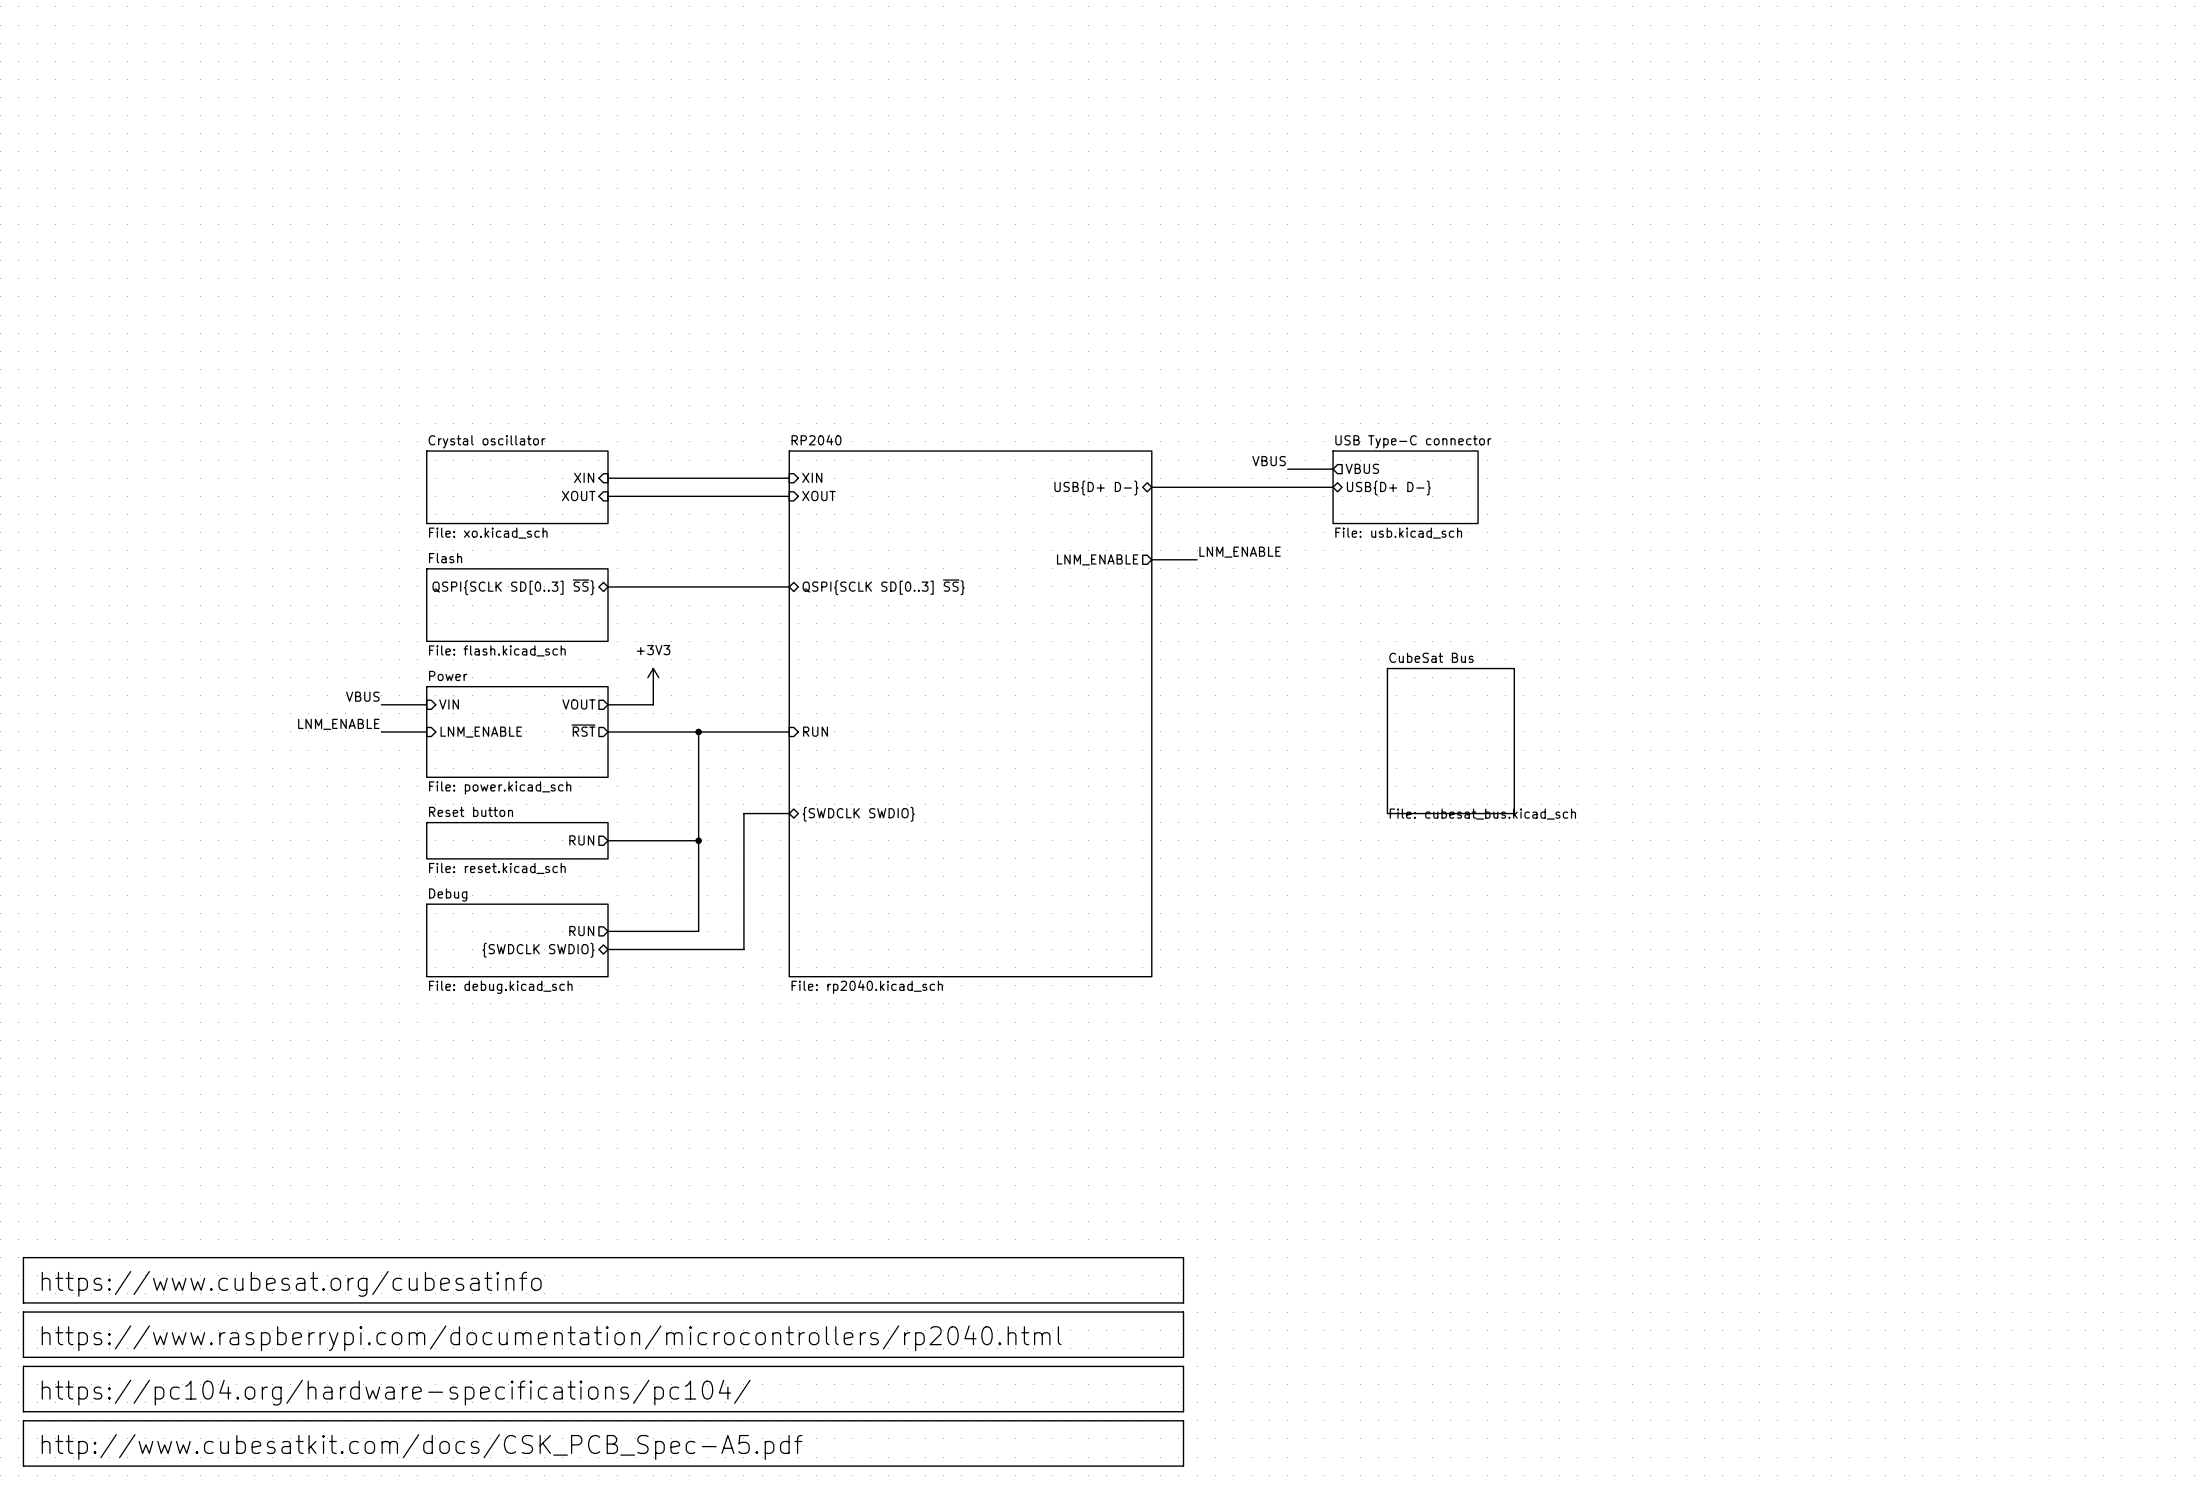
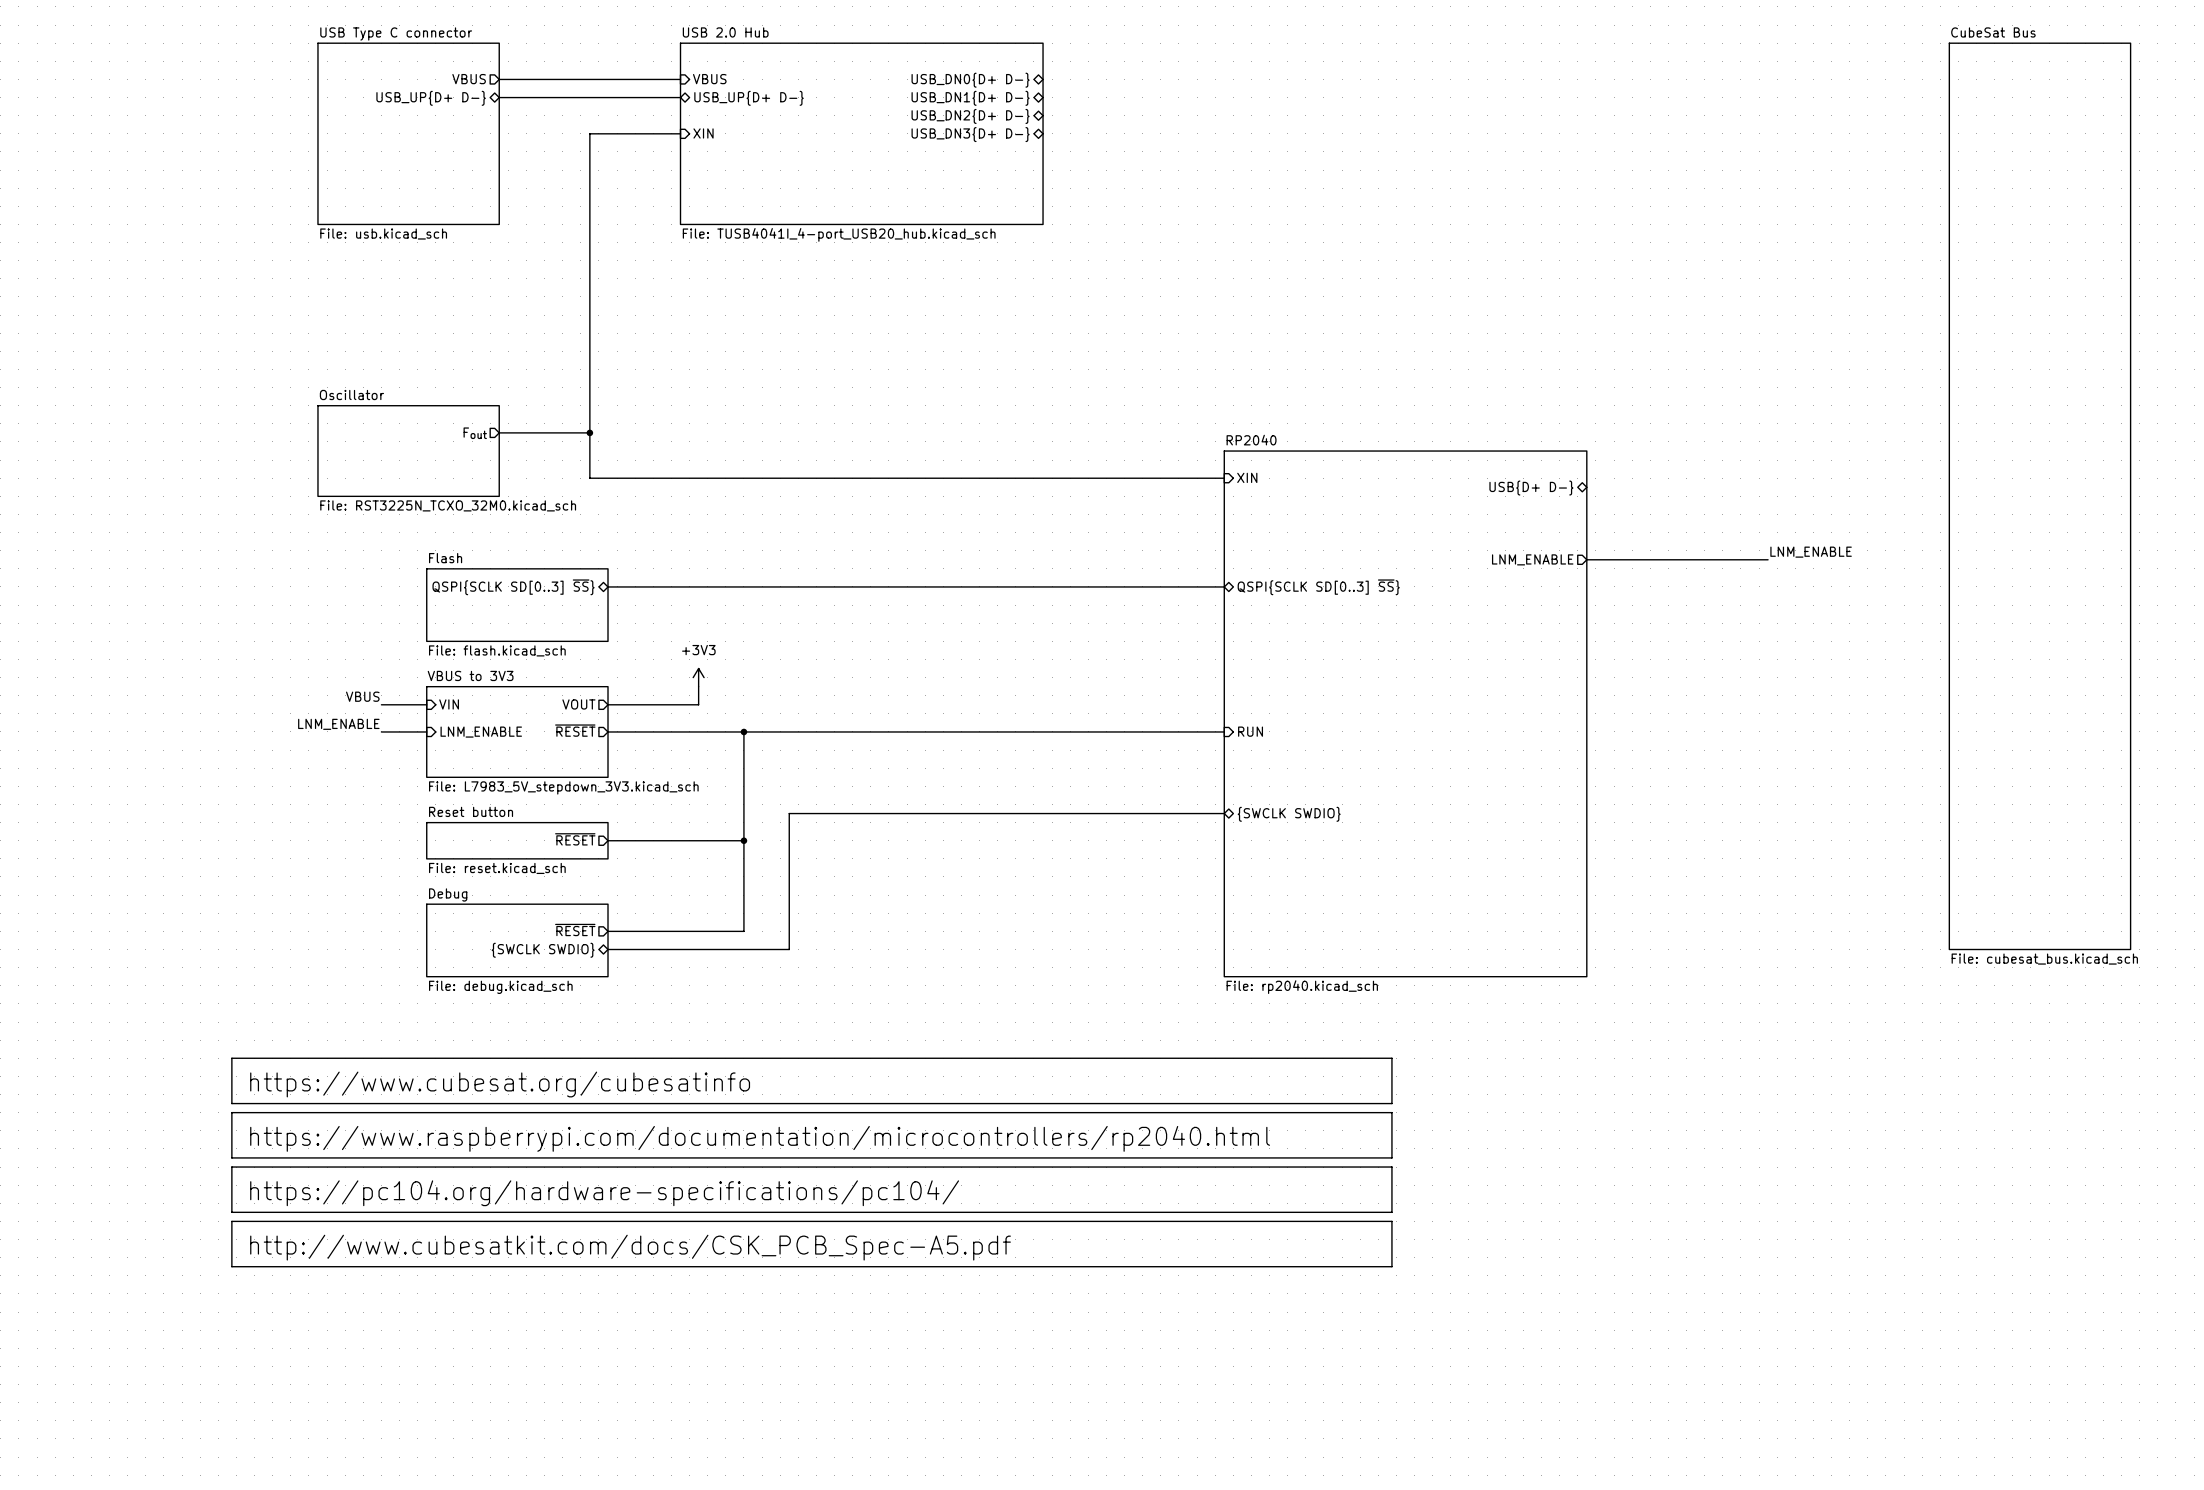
sheet pin: none -> VBUS (469, 79)
wire: none -> (499, 79) (680, 79)
sheet pin: none -> VBUS (709, 79)
sheet pin: none -> USB_DN0{D+ D-} (970, 80)
bus: none -> (499, 97) (680, 97)
sheet pin: none -> USB_UP{D+ D-} (431, 98)
sheet pin: none -> USB_UP{D+ D-} (749, 98)
sheet pin: none -> USB_DN1{D+ D-} (970, 98)
sheet pin: none -> USB_DN2{D+ D-} (970, 116)
sheet USB Type C connector: none -> File: usb.kicad_sch (408, 133)
wire: none -> (680, 133) (589, 133) (589, 478) (608, 478)
sheet pin: none -> XIN (703, 133)
sheet USB 2.0 Hub: none -> File: TUSB4041I_4-port_USB20_hub.kicad_sch (861, 133)
sheet pin: none -> USB_DN3{D+ D-} (970, 134)
wire: none -> (499, 432) (589, 432)
junction: none -> (589, 432)
sheet pin: none -> Fout (475, 433)
sheet Oscillator: none -> File: RST3225N_TCXO_32M0.kicad_sch (408, 451)
label: VBUS (1269, 461) -> none
sheet pin: VBUS (1362, 468) -> none
wire: (1287, 469) (1333, 469) -> none
sheet pin: XIN (584, 477) -> none
sheet pin: XIN (812, 477) -> none
sheet pin: none -> XIN (1247, 477)
wire: none -> (789, 478) (1224, 478)
sheet Crystal oscillator: File: xo.kicad_sch (517, 487) -> none
bus: (1151, 487) (1333, 487) -> none
sheet USB Type-C connector: File: usb.kicad_sch (1405, 487) -> none
sheet pin: USB{D+ D-} (1096, 488) -> none
sheet pin: USB{D+ D-} (1388, 488) -> none
sheet pin: none -> USB{D+ D-} (1531, 488)
sheet pin: XOUT (578, 496) -> none
wire: (608, 496) (789, 496) -> none
sheet pin: XOUT (818, 496) -> none
sheet CubeSat Bus: none -> File: cubesat_bus.kicad_sch (2039, 496)
label: LNM_ENABLE (1240, 552) -> none
label: none -> LNM_ENABLE (1811, 552)
sheet pin: LNM_ENABLE (1097, 559) -> none
wire: (1151, 559) (1197, 559) -> none
sheet pin: none -> LNM_ENABLE (1532, 559)
wire: none -> (1586, 559) (1768, 559)
bus: none -> (789, 586) (1224, 586)
sheet pin: QSPI{SCLK SD[0..3] ~{SS}} (883, 587) -> none
sheet pin: none -> QSPI{SCLK SD[0..3] ~{SS}} (1318, 587)
sheet Power name: Power (448, 675) -> VBUS to 3V3 (470, 675)
power symbol position: +3V3 (653, 677) -> +3V3 (698, 677)
wire: (653, 686) (653, 704) -> (698, 686) (698, 704) (653, 704)
sheet RP2040 position: (970, 713) -> (1405, 713)
sheet pin: ~{RST} (583, 730) -> ~{RESET} (575, 730)
wire: (698, 731) (698, 931) -> (743, 731) (743, 931) (698, 931)
junction: (698, 731) -> none
junction: none -> (743, 731)
wire: none -> (789, 731) (1224, 731)
sheet pin: RUN (815, 731) -> none
sheet pin: none -> RUN (1250, 731)
sheet CubeSat Bus: File: cubesat_bus.kicad_sch (1450, 741) -> none
sheet Power value: File: power.kicad_sch (500, 787) -> File: L7983_5V_stepdown_3V3.kicad_sch (563, 787)
bus: (789, 813) (743, 813) (743, 949) -> (1224, 813) (789, 813) (789, 949) (743, 949)
sheet pin: {SWDCLK SWDIO} (858, 814) -> none
sheet pin: none -> {SWCLK SWDIO} (1289, 814)
sheet pin: RUN (581, 840) -> ~{RESET} (575, 839)
wire: none -> (698, 840) (743, 840)
junction: (698, 840) -> none
junction: none -> (743, 840)
sheet pin: RUN (581, 931) -> ~{RESET} (575, 929)
sheet pin: {SWDCLK SWDIO} (538, 950) -> {SWCLK SWDIO} (543, 950)
line: none -> (231, 1058) (231, 1103) (1391, 1103) (1391, 1058) (231, 1058)
text: none -> https://www.cubesat.org/cubesatinfo (500, 1084)
line: none -> (231, 1112) (231, 1157) (1391, 1157) (1391, 1112) (231, 1112)
text: none -> https://www.raspberrypi.com/documentation/microcontrollers/rp2040.html (760, 1138)
line: none -> (231, 1167) (231, 1212) (1391, 1212) (1391, 1167) (231, 1167)
text: none -> https://pc104.org/hardware-specifications/pc104/ (604, 1193)
line: none -> (231, 1221) (1391, 1221) (1391, 1266) (231, 1266) (231, 1221)
text: none -> http://www.cubesatkit.com/docs/CSK_PCB_Spec-A5.pdf (630, 1247)
line: (23, 1257) (23, 1302) (1183, 1302) (1183, 1257) (23, 1257) -> none
text: https://www.cubesat.org/cubesatinfo (291, 1283) -> none
line: (23, 1312) (23, 1357) (1183, 1357) (1183, 1312) (23, 1312) -> none
text: https://www.raspberrypi.com/documentation/microcontrollers/rp2040.html (551, 1338) -> none
line: (23, 1366) (23, 1411) (1183, 1411) (1183, 1366) (23, 1366) -> none
text: https://pc104.org/hardware-specifications/pc104/ (396, 1392) -> none
line: (23, 1420) (1183, 1420) (1183, 1466) (23, 1466) (23, 1420) -> none
text: http://www.cubesatkit.com/docs/CSK_PCB_Spec-A5.pdf (422, 1447) -> none

